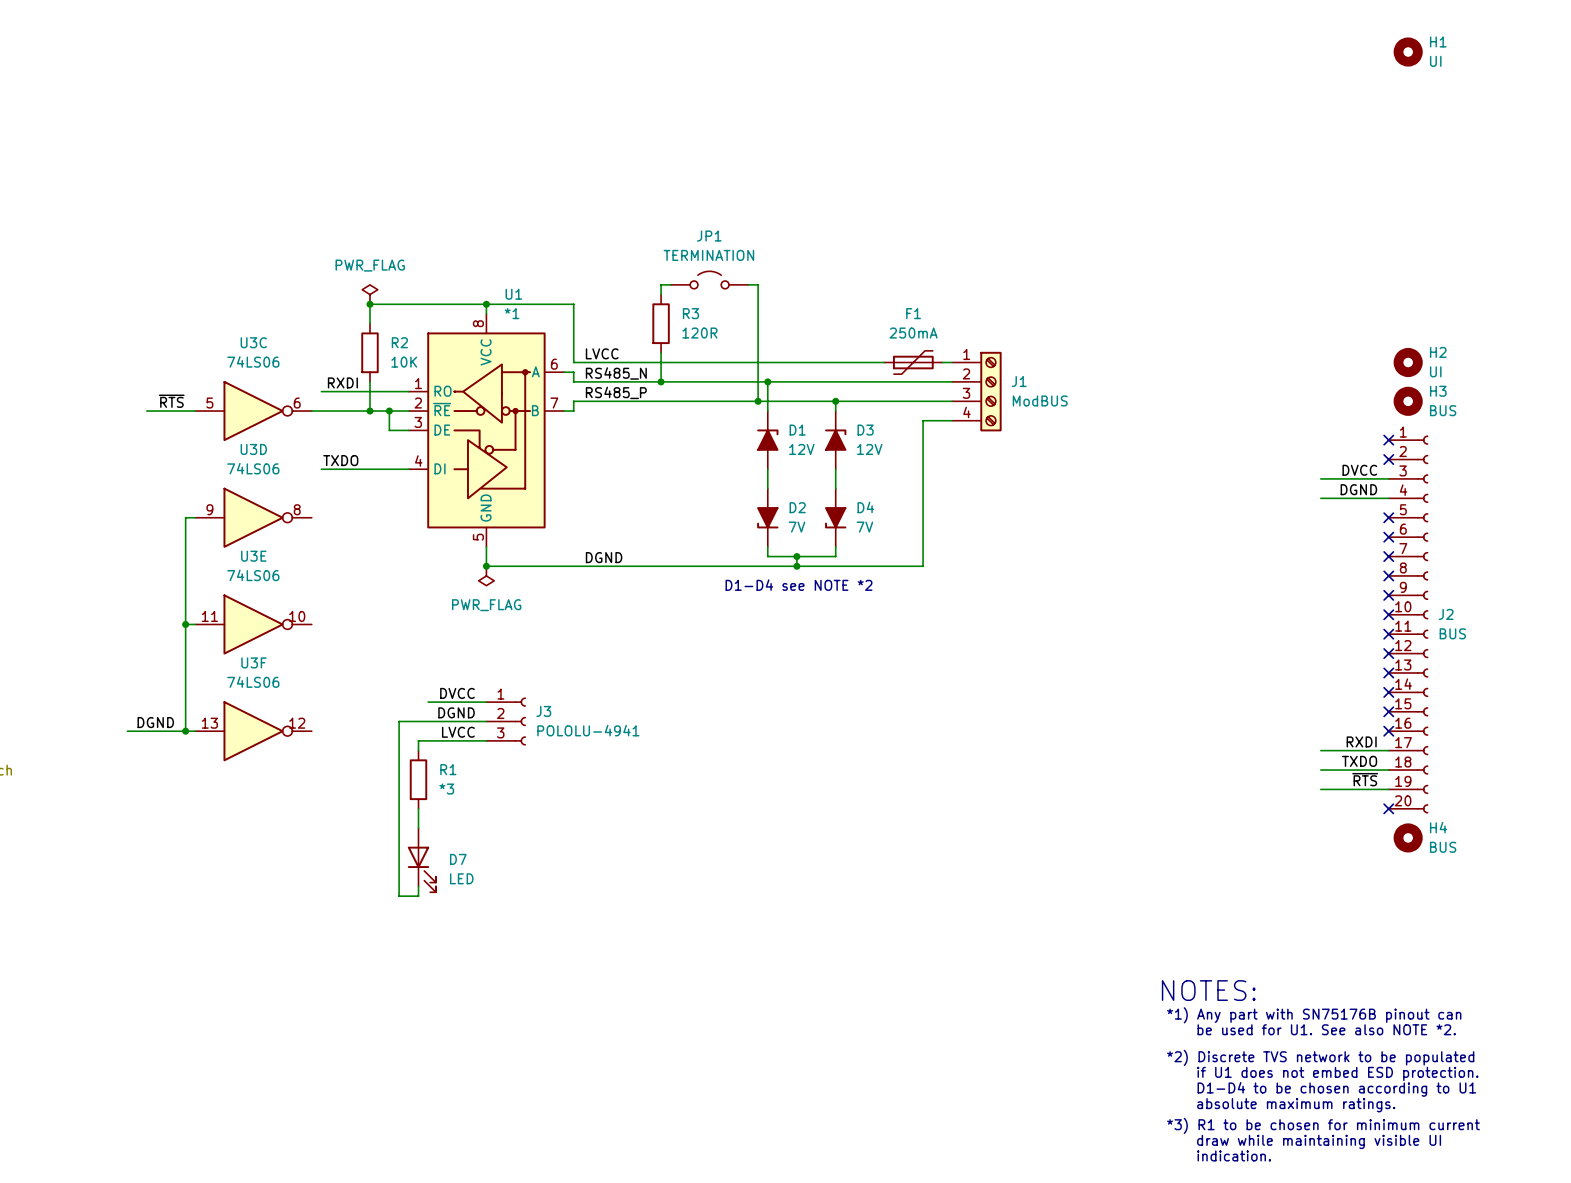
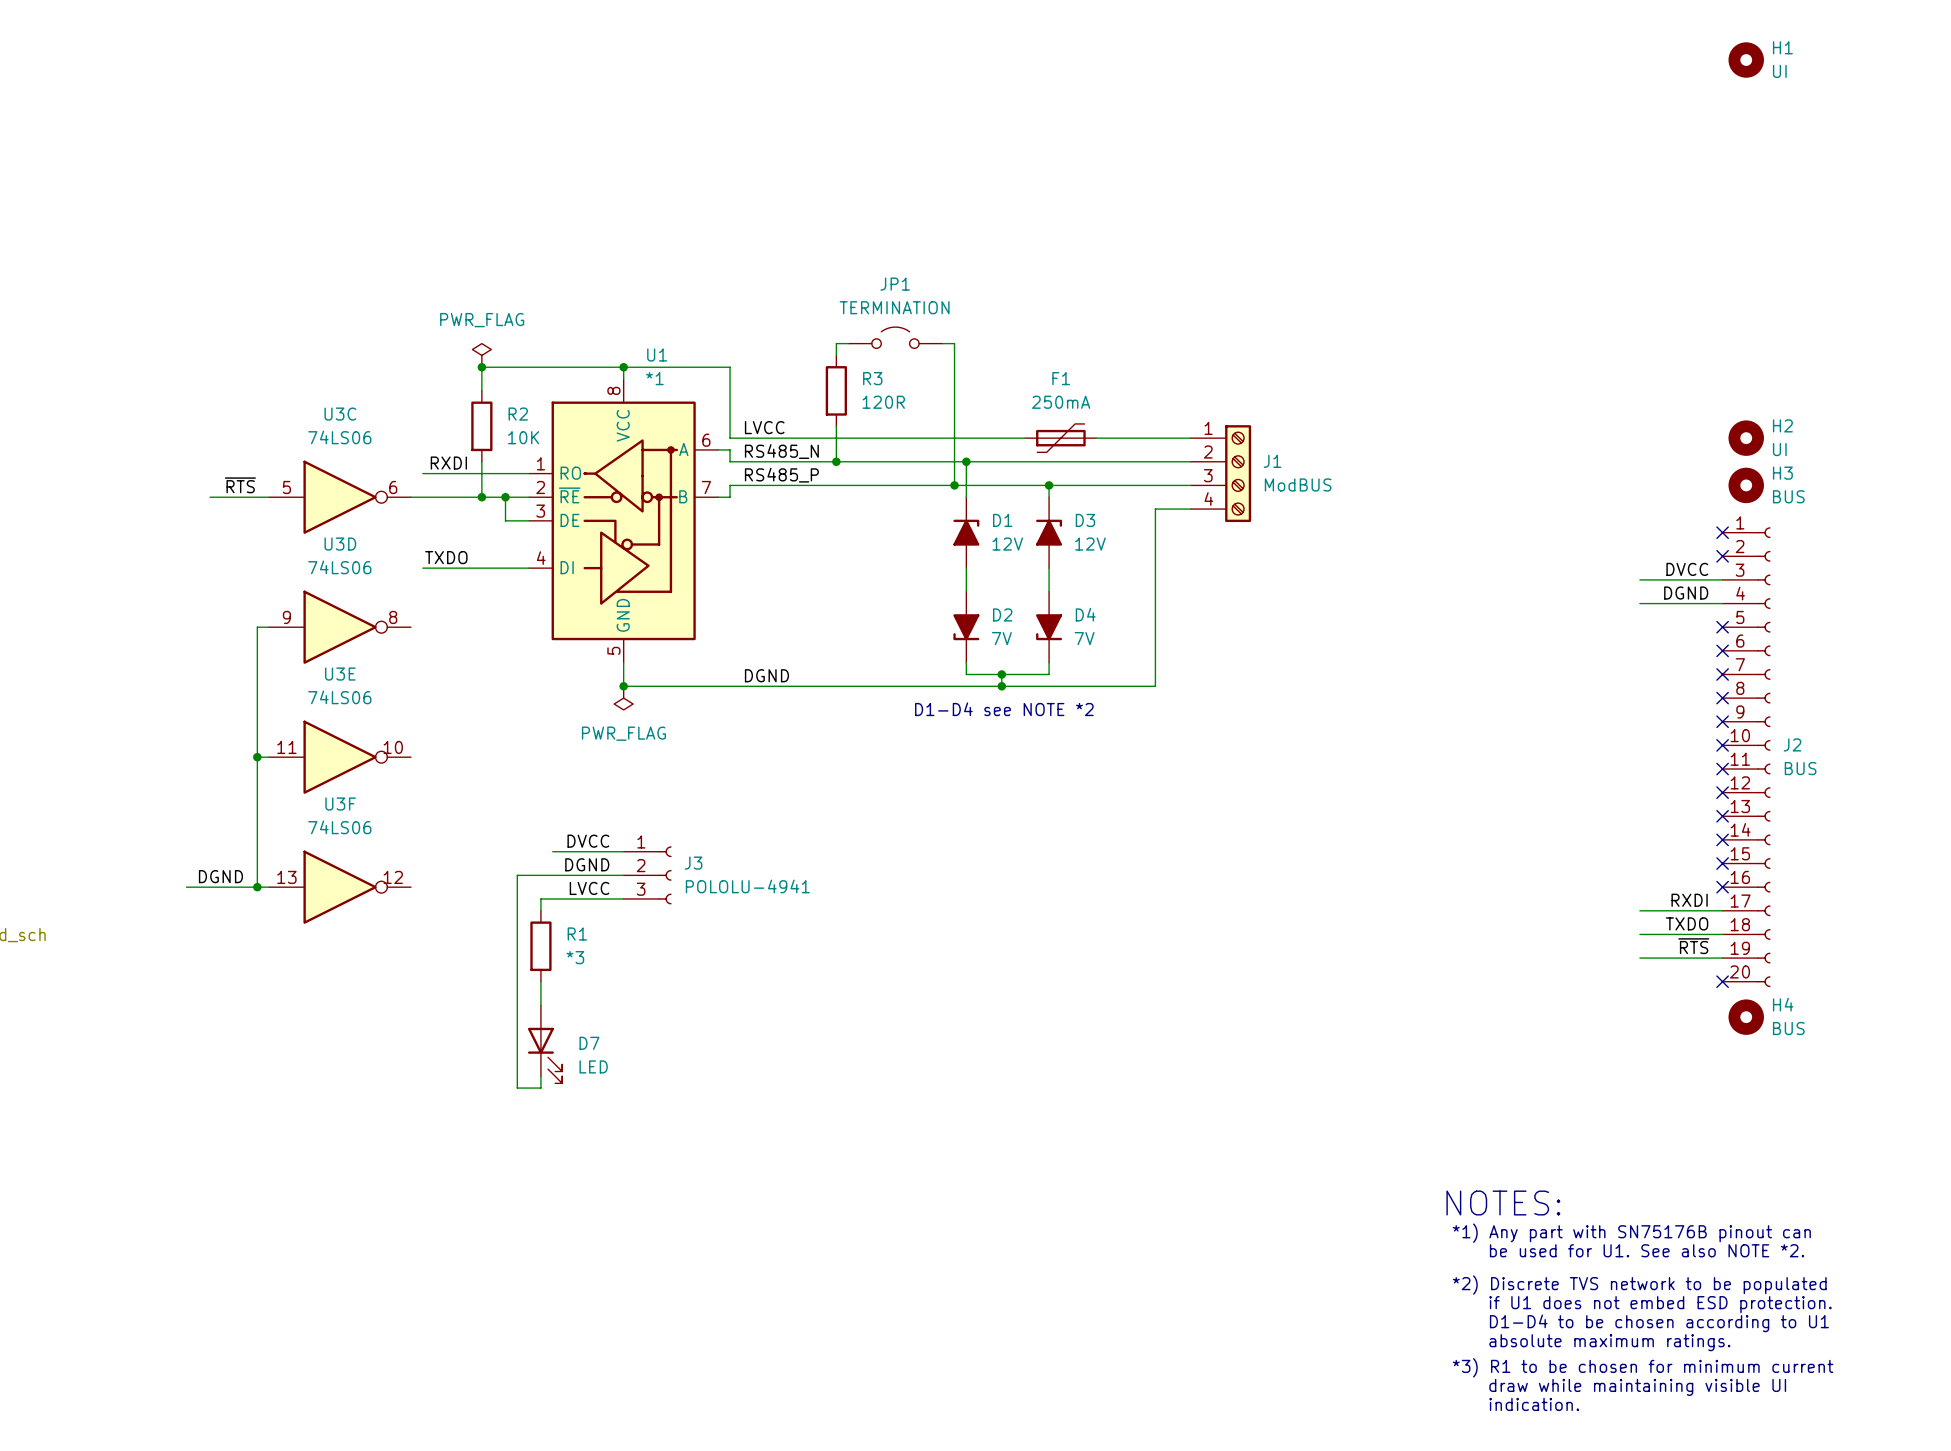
F1 position: (913, 362) -> (1060, 438)

